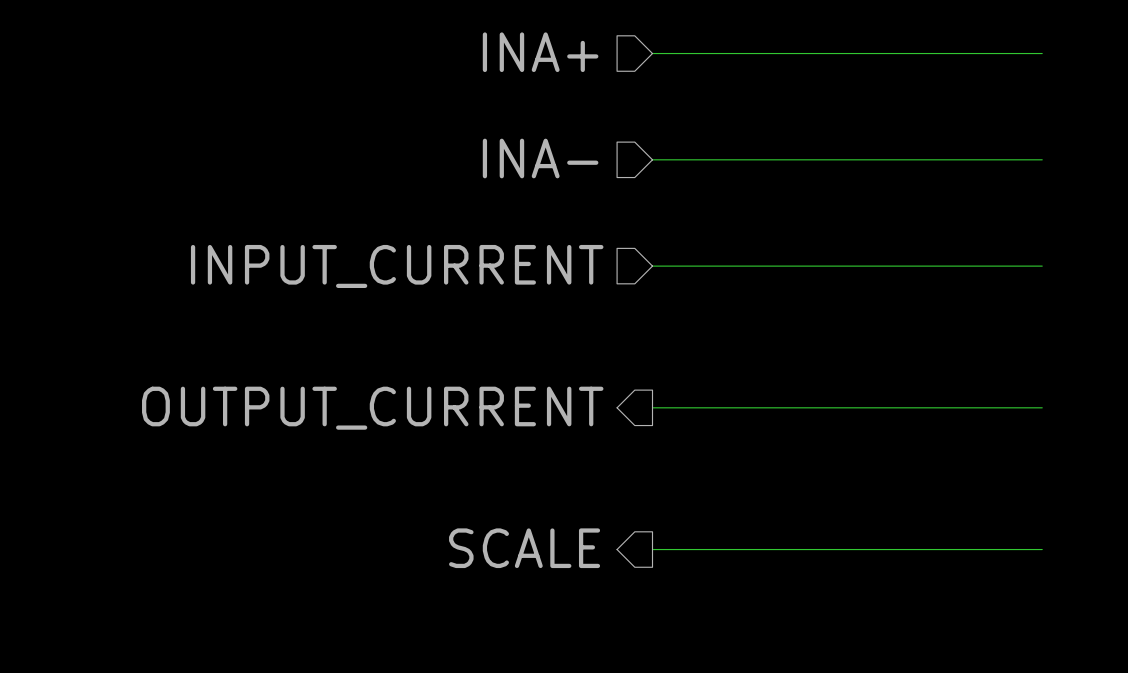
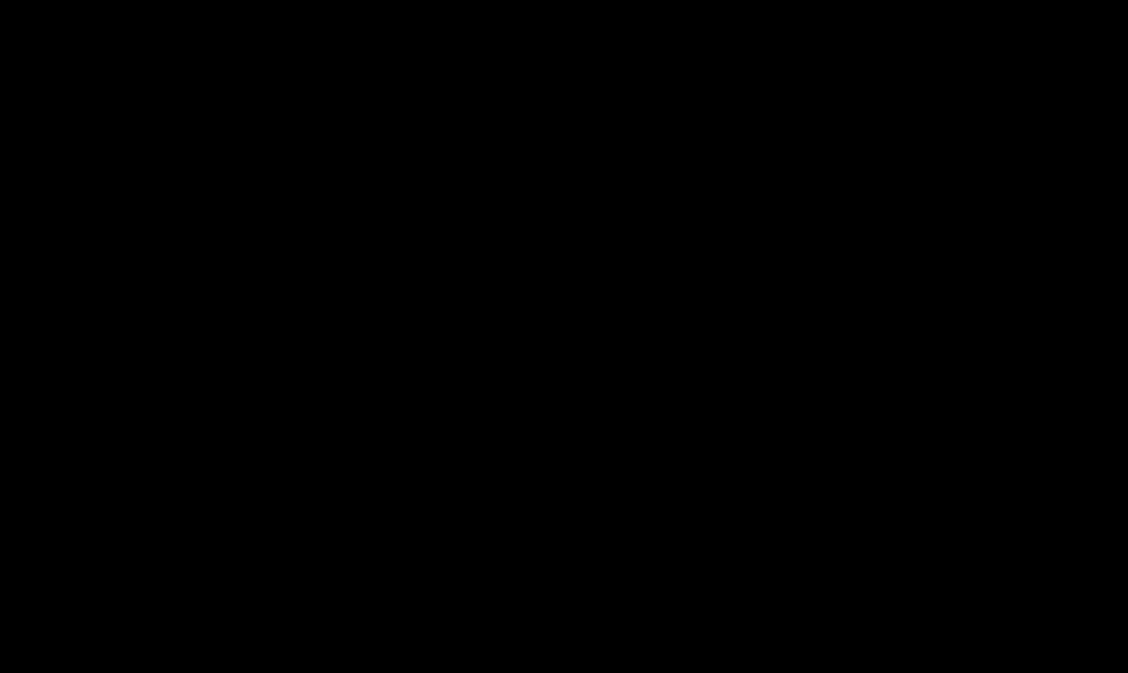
hierarchical label: INA+ (540, 52) -> none
wire: (652, 53) (1042, 53) -> none
hierarchical label: INA- (540, 158) -> none
wire: (652, 159) (1042, 159) -> none
hierarchical label: INPUT_CURRENT (397, 266) -> none
wire: (652, 266) (1042, 266) -> none
wire: (652, 407) (1042, 407) -> none
hierarchical label: OUTPUT_CURRENT (372, 408) -> none
hierarchical label: SCALE (524, 548) -> none
wire: (652, 549) (1042, 549) -> none

